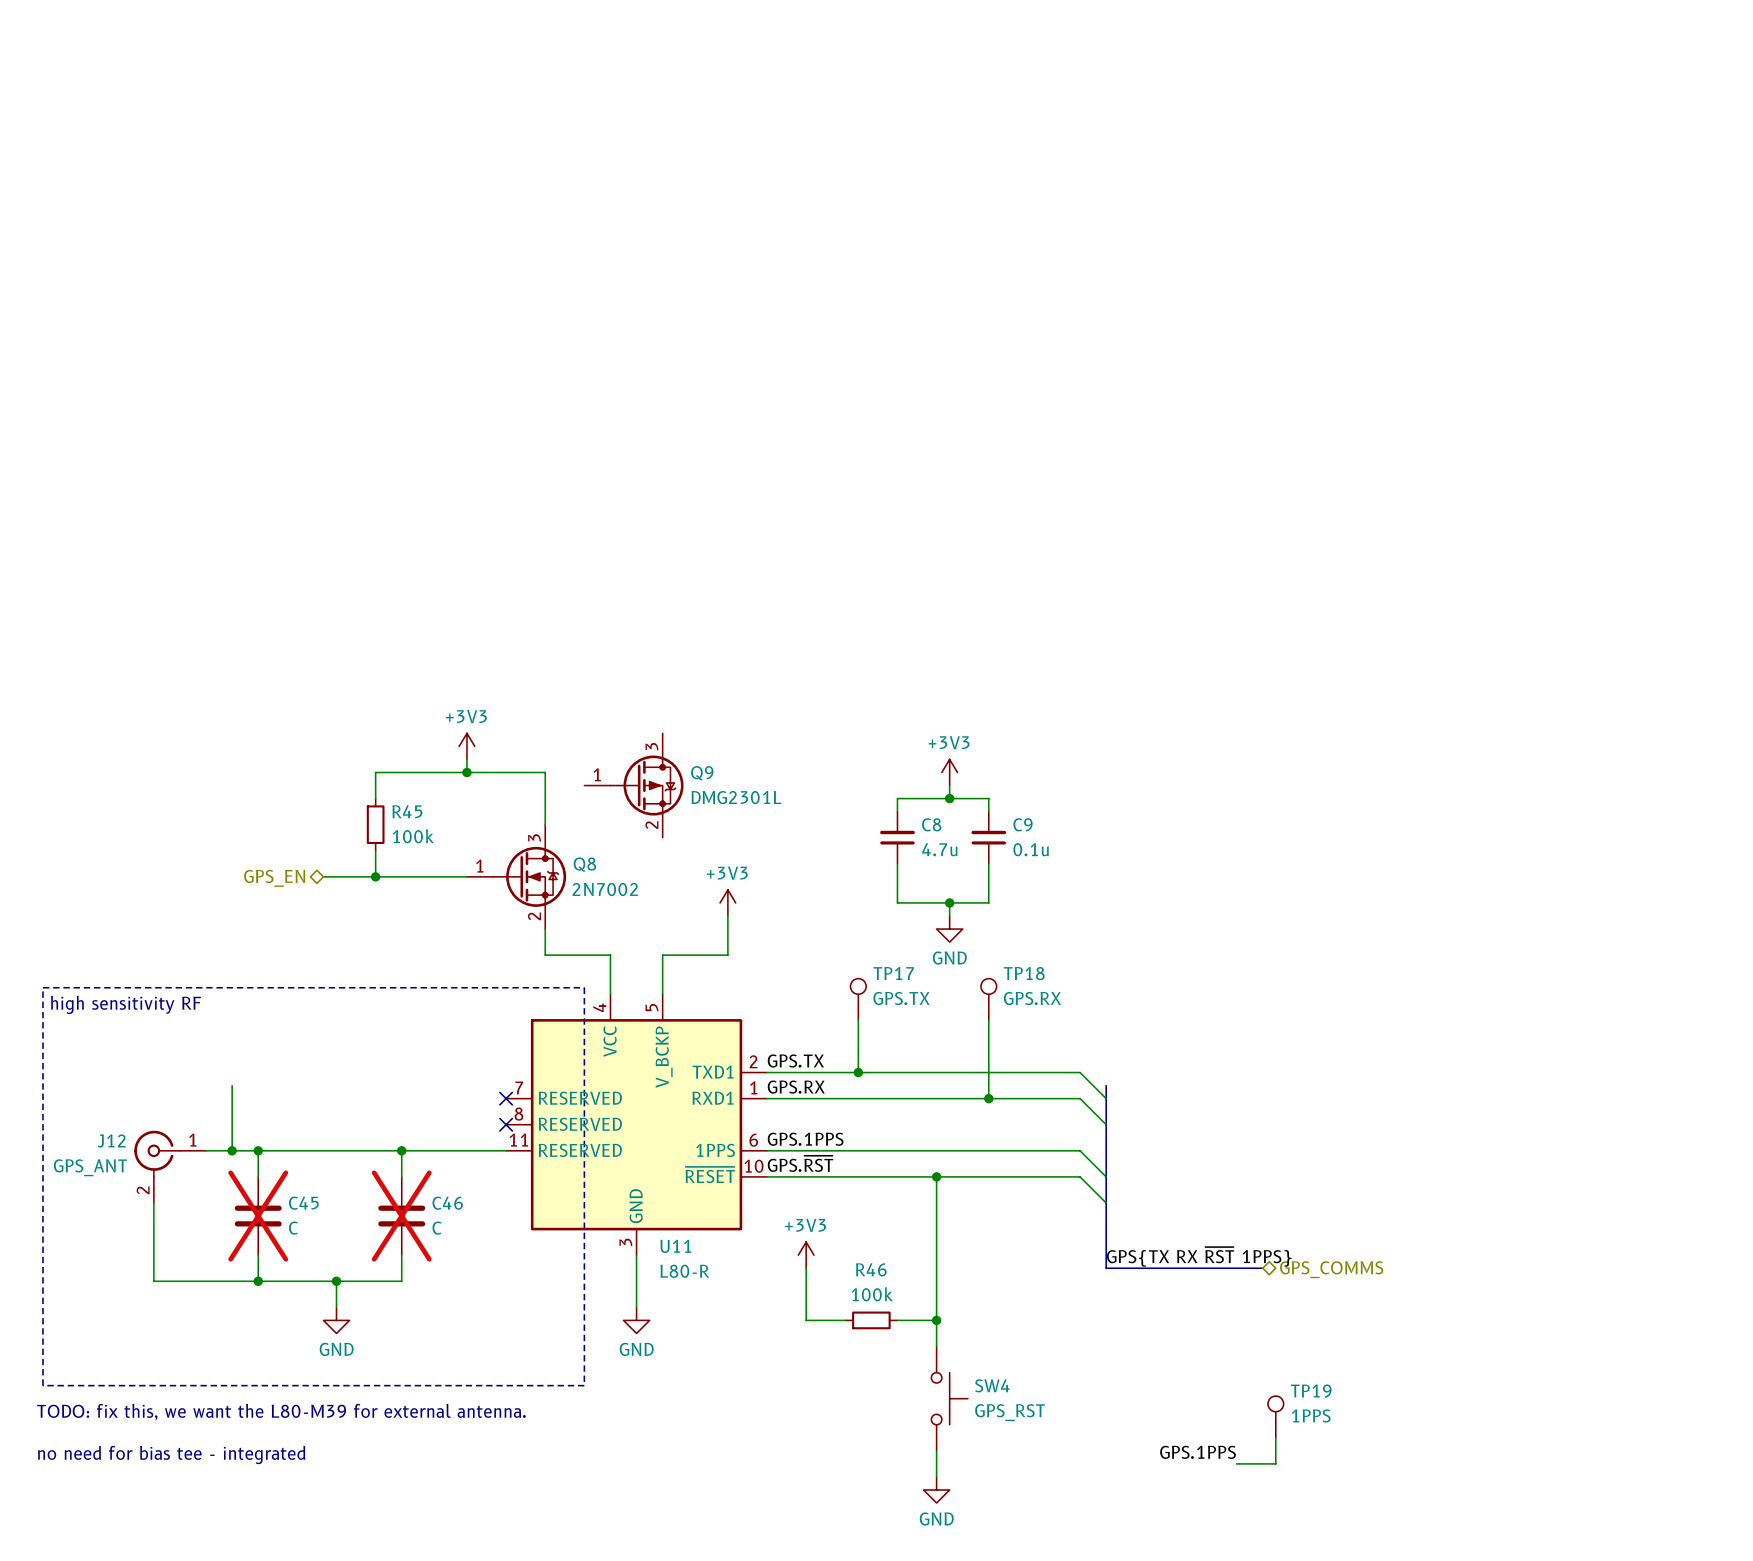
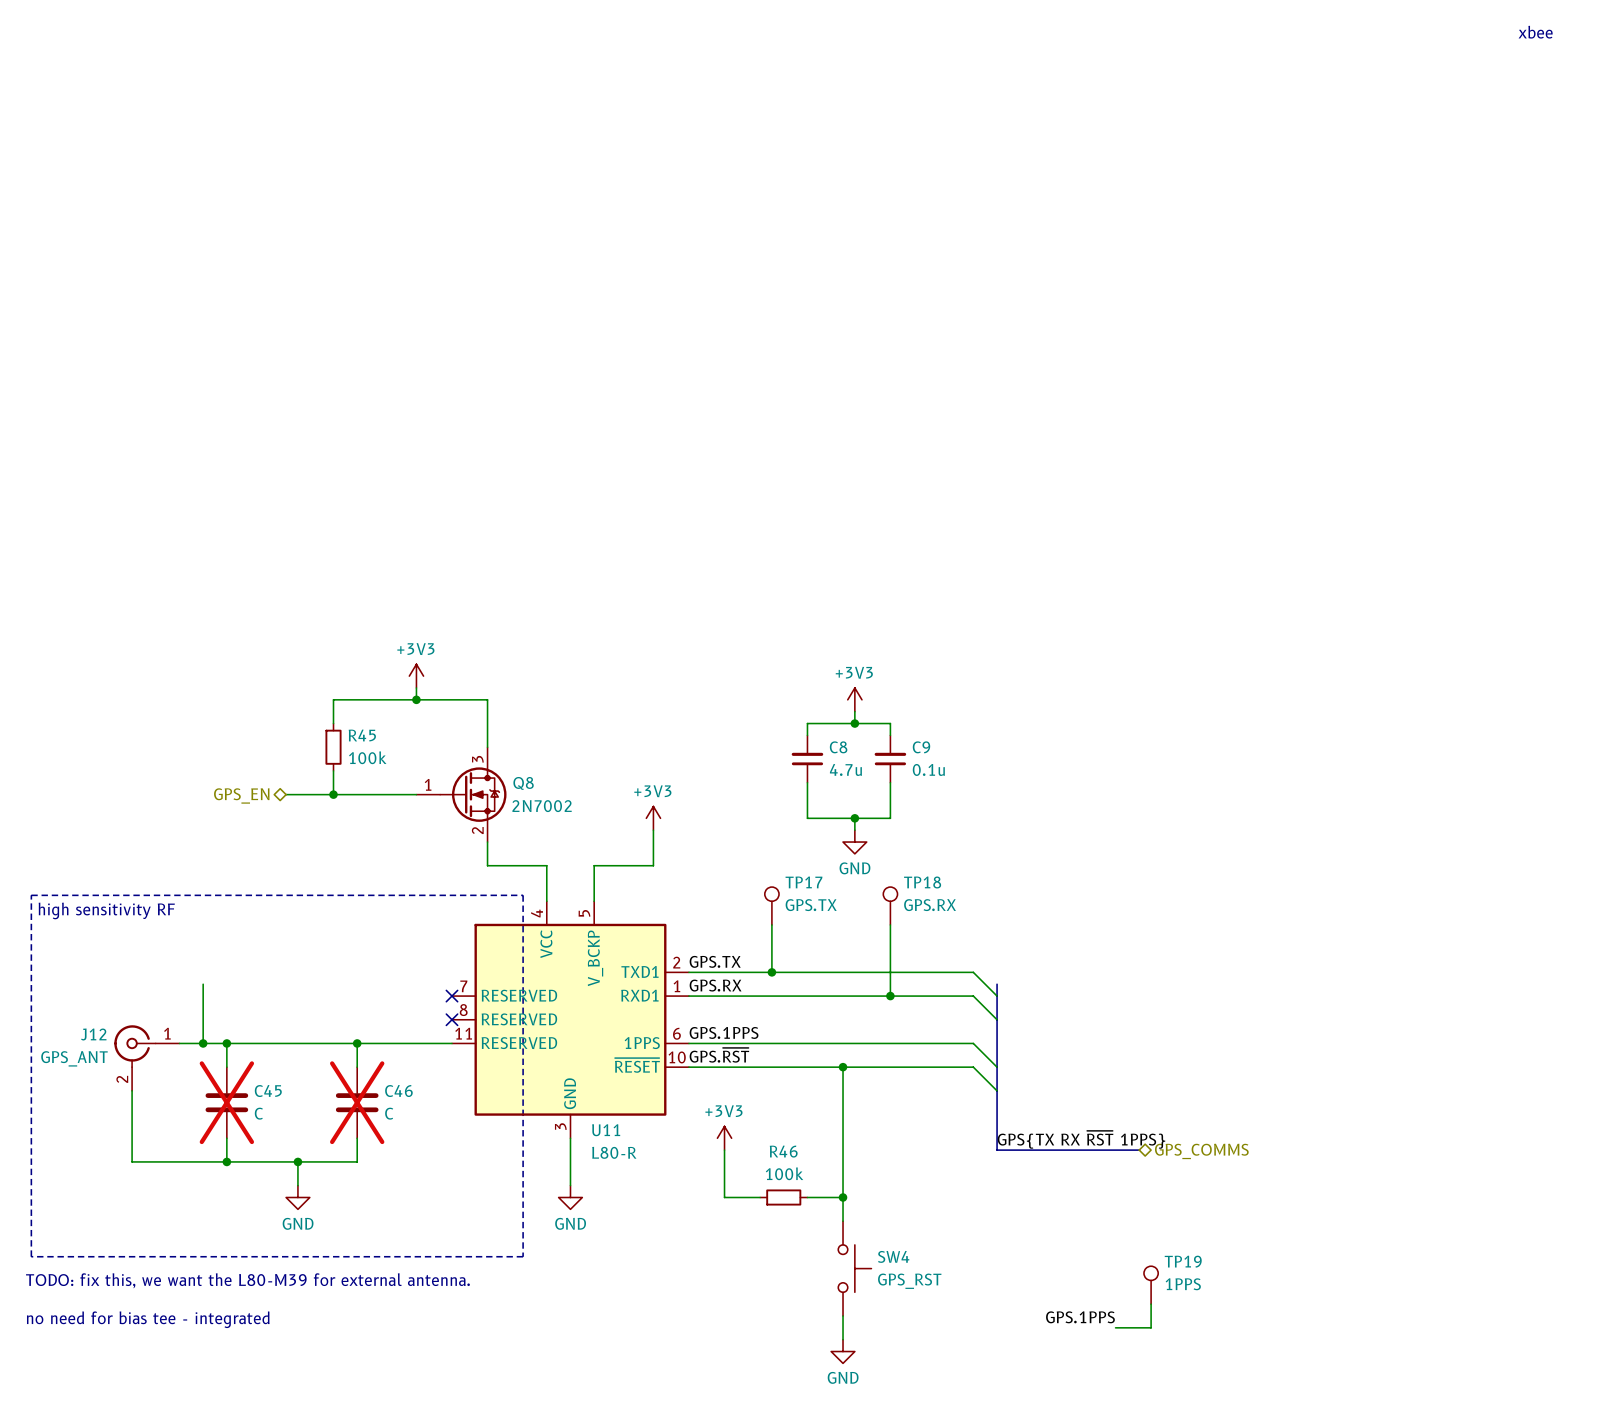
text: none -> xbee (1535, 32)
Q9: DMG2301L (633, 785) -> none

